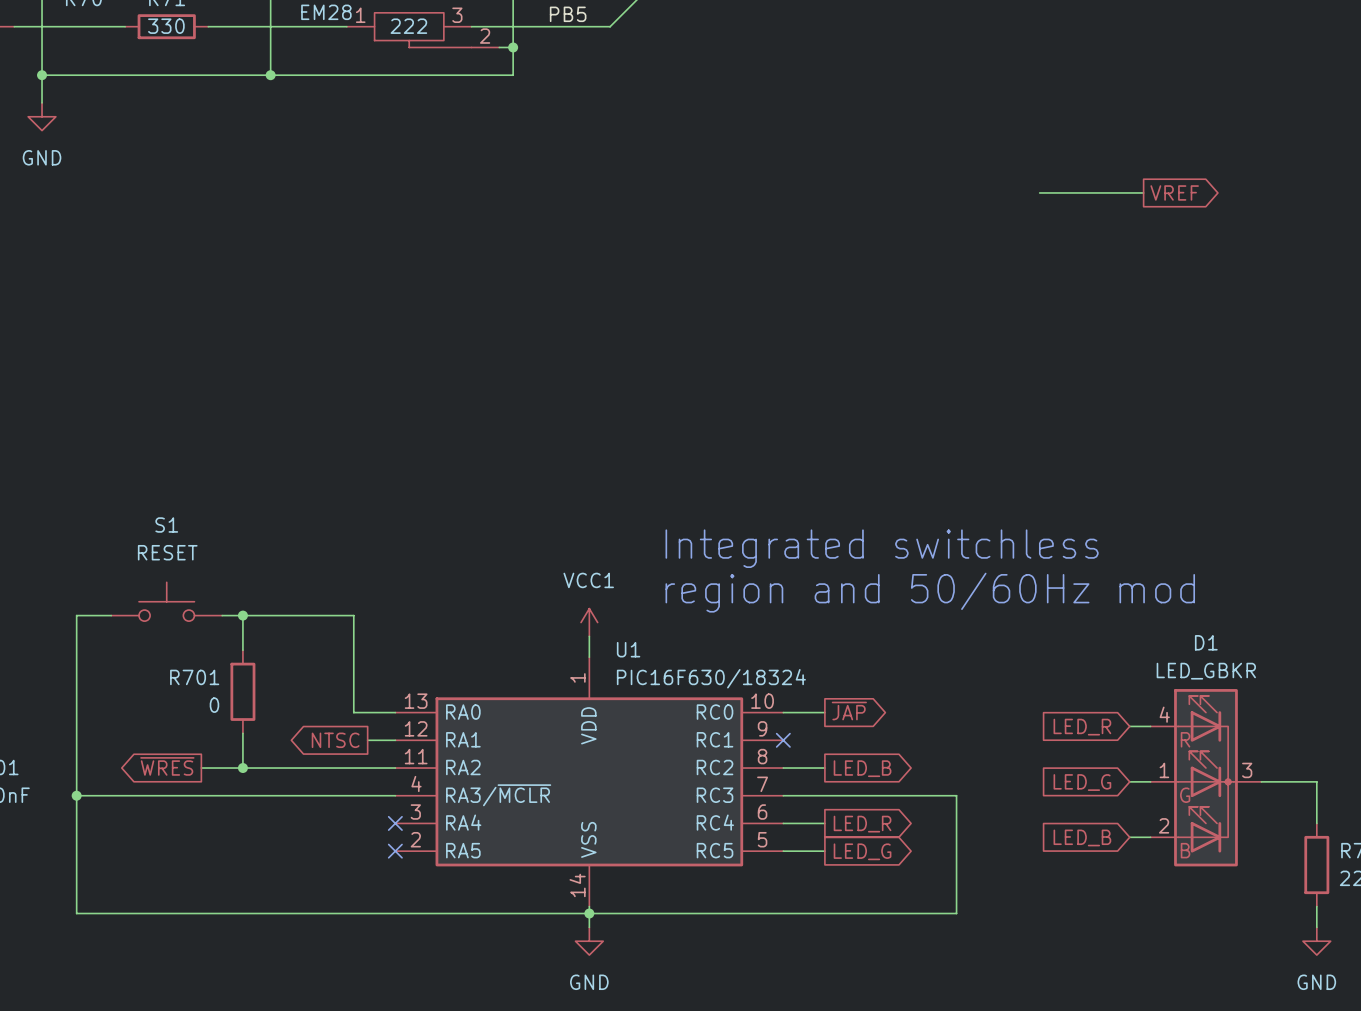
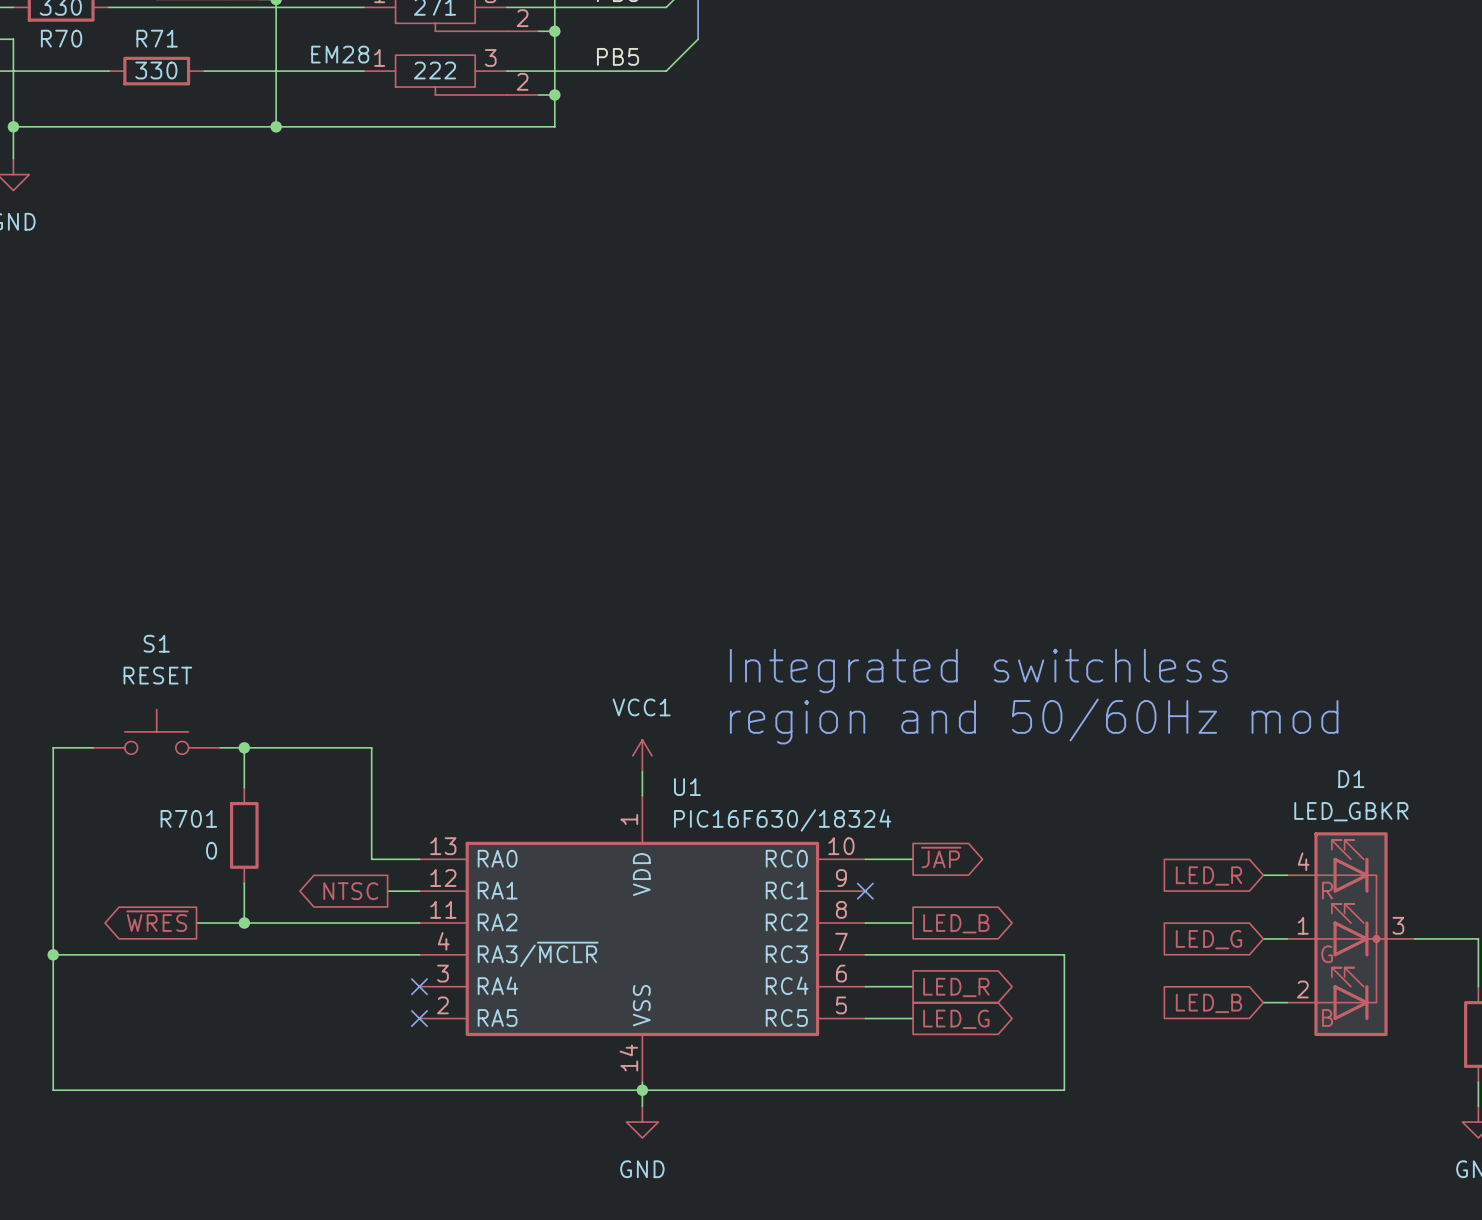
wire: (1039, 192) (1143, 192) -> none
global label: VREF (1174, 192) -> none

